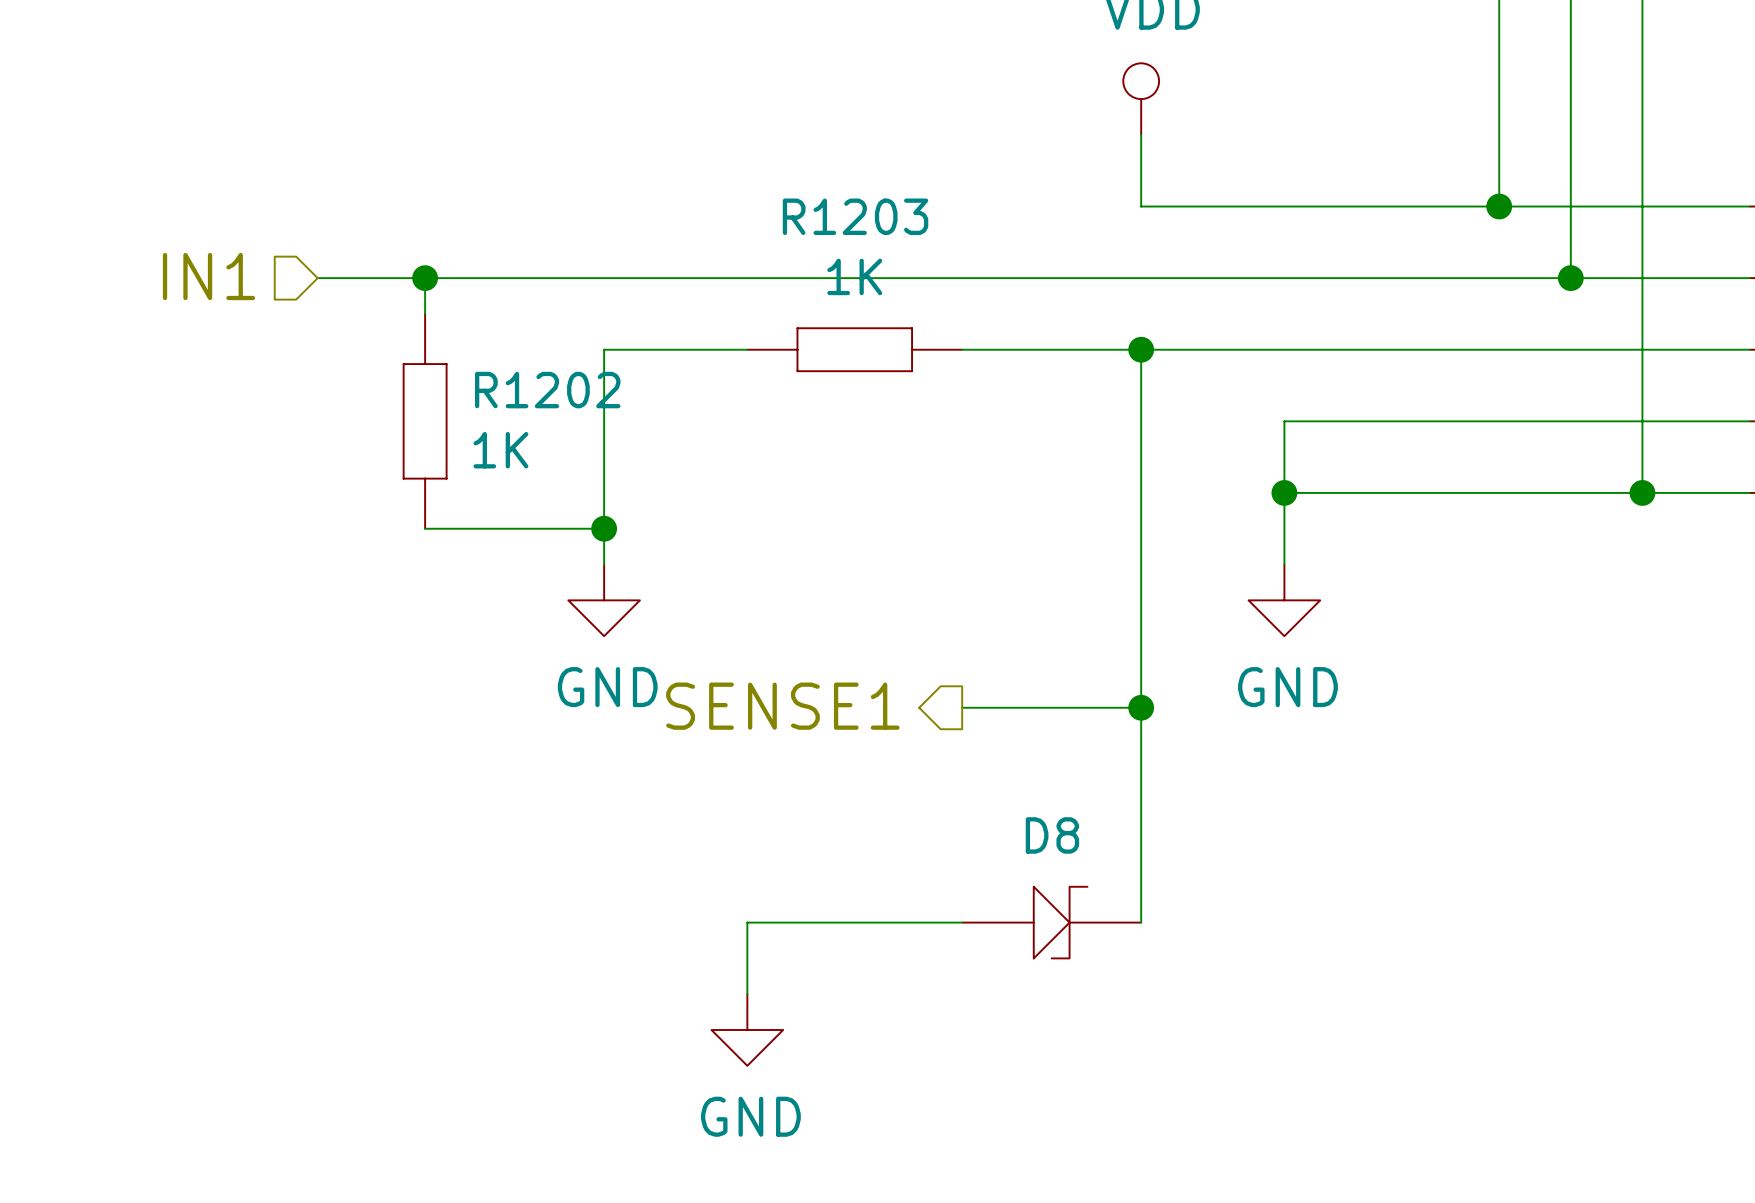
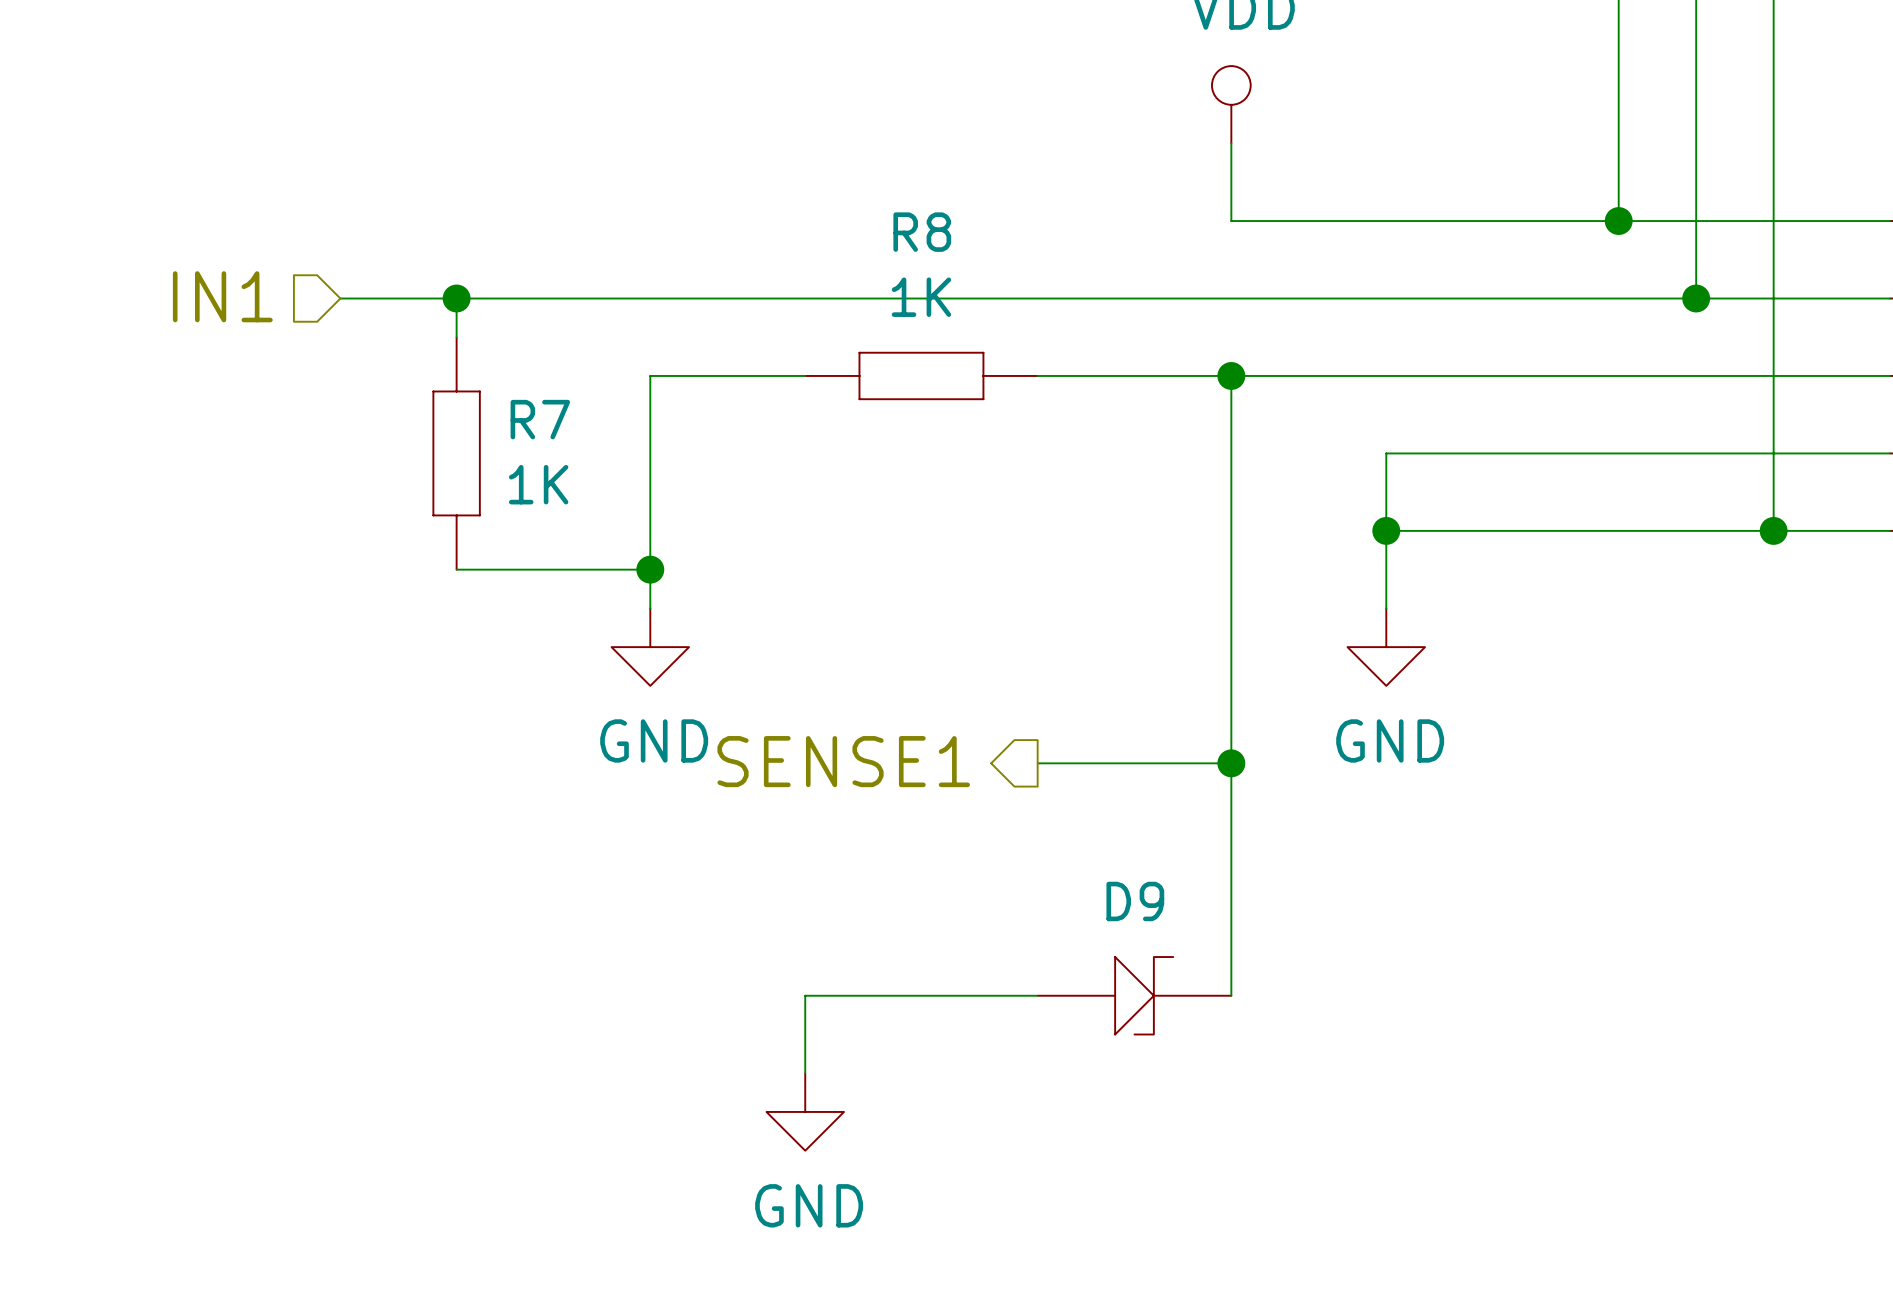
R1203 name: R1203 (855, 216) -> R8 (922, 232)
R1202 name: R1202 (547, 390) -> R7 (540, 419)
D8 name: D8 (1052, 835) -> D9 (1135, 901)

